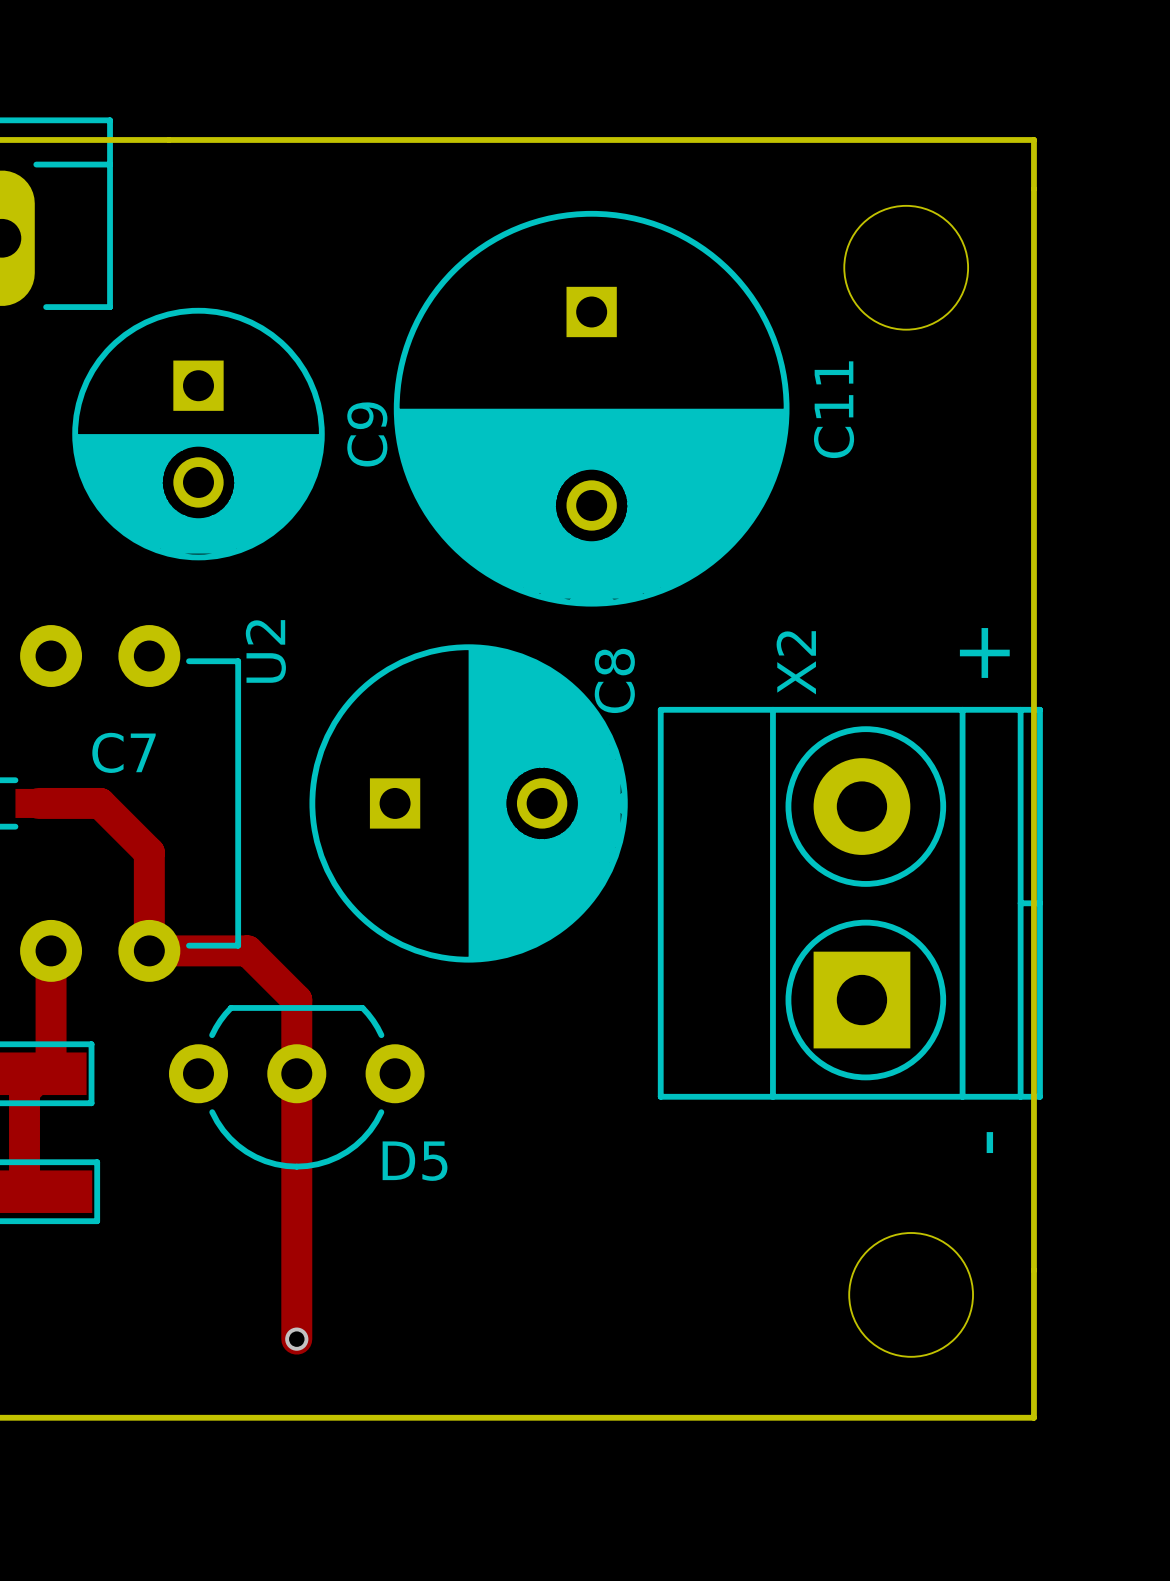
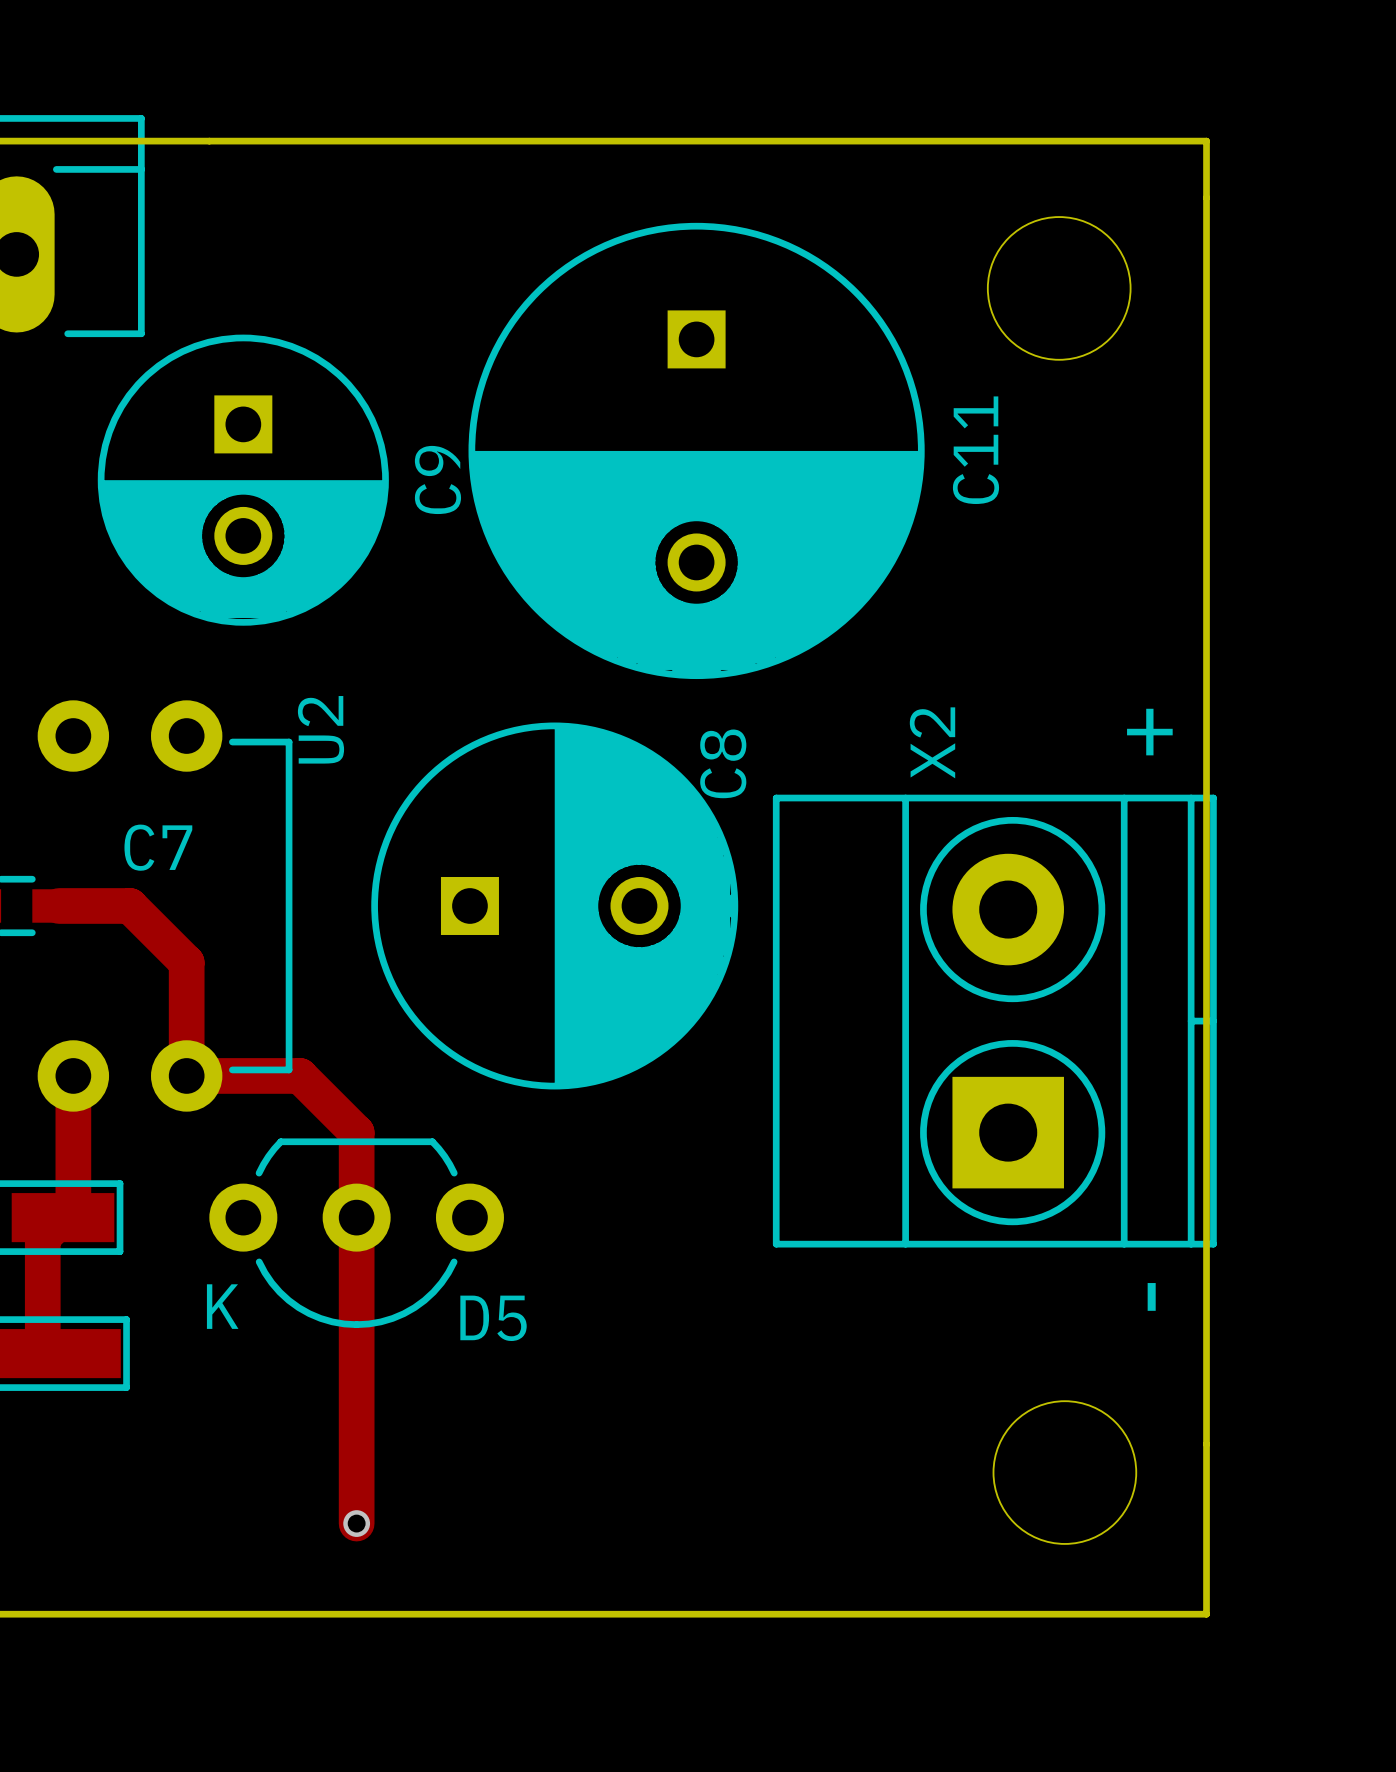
text: none -> K (222, 1306)

